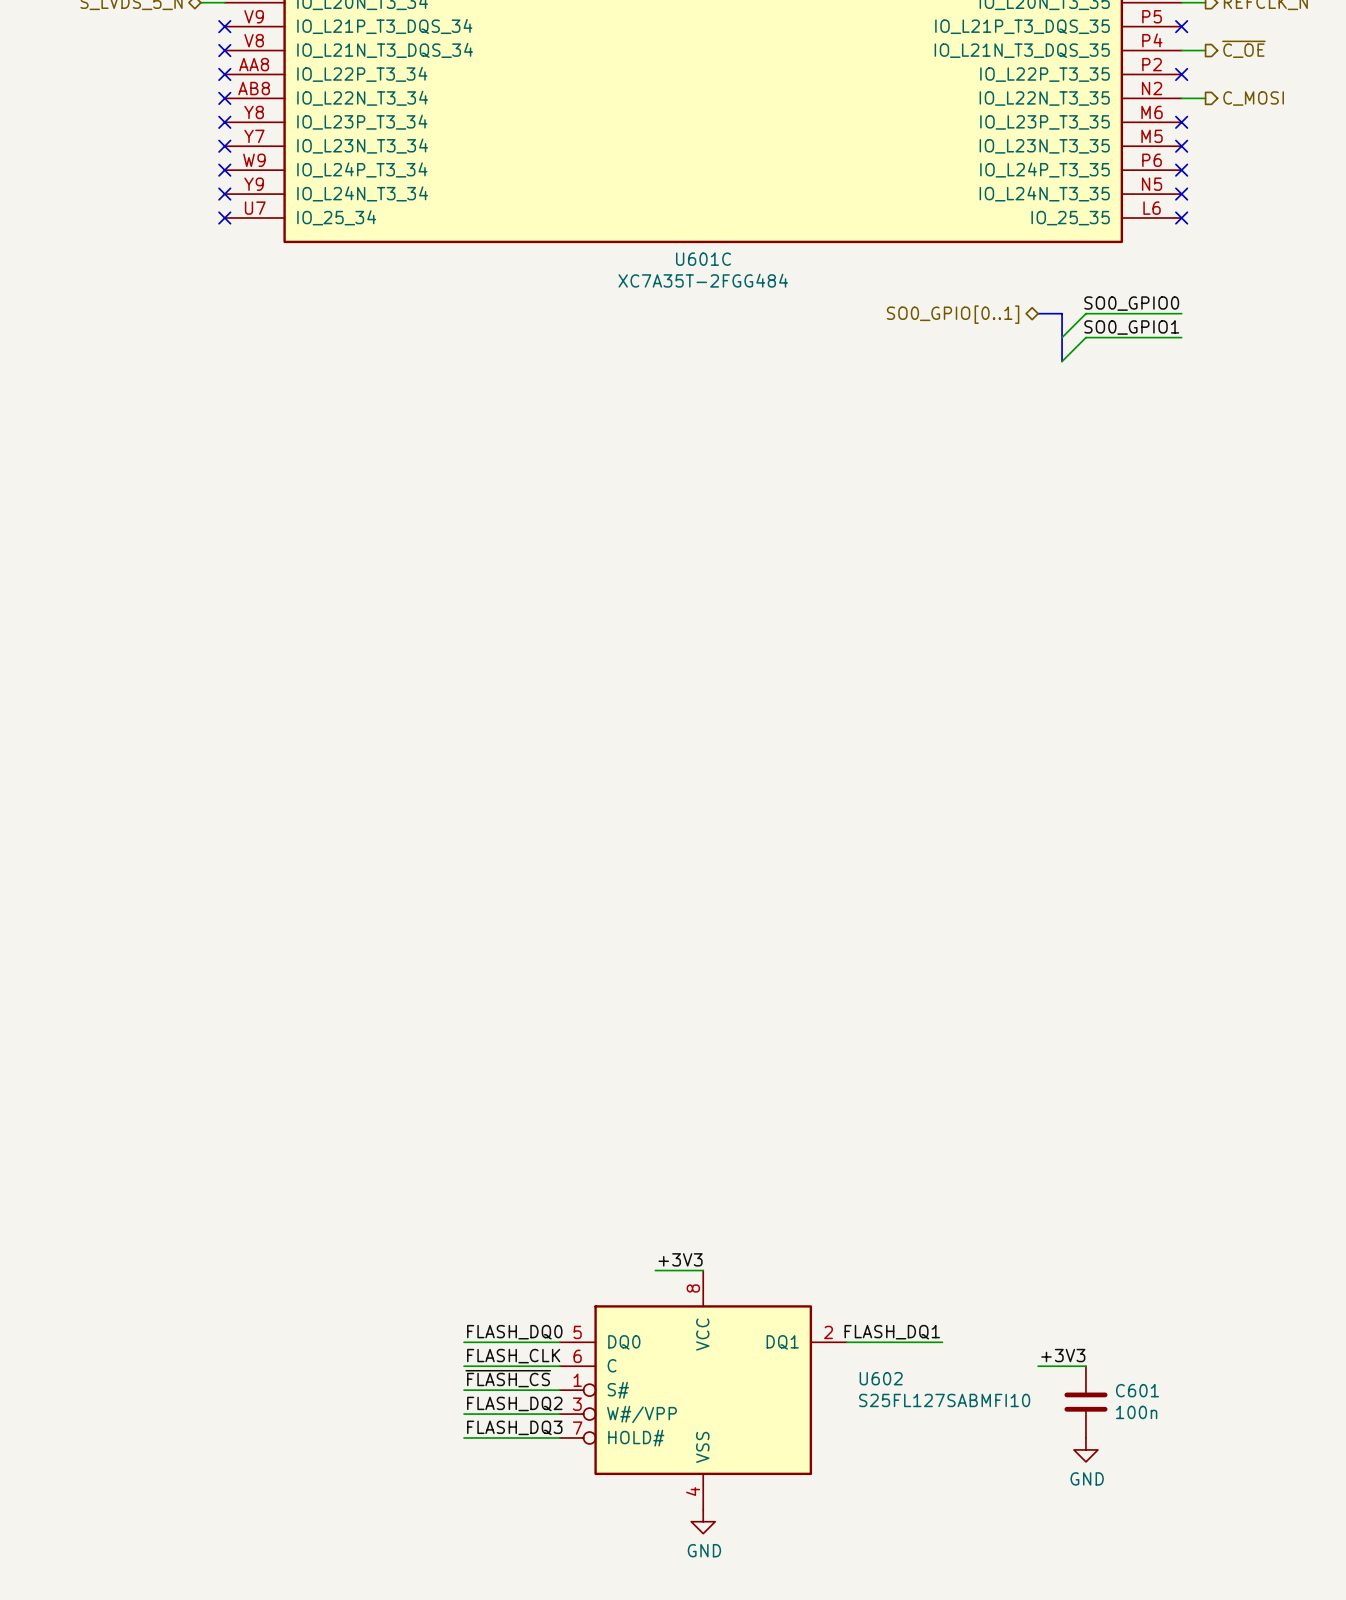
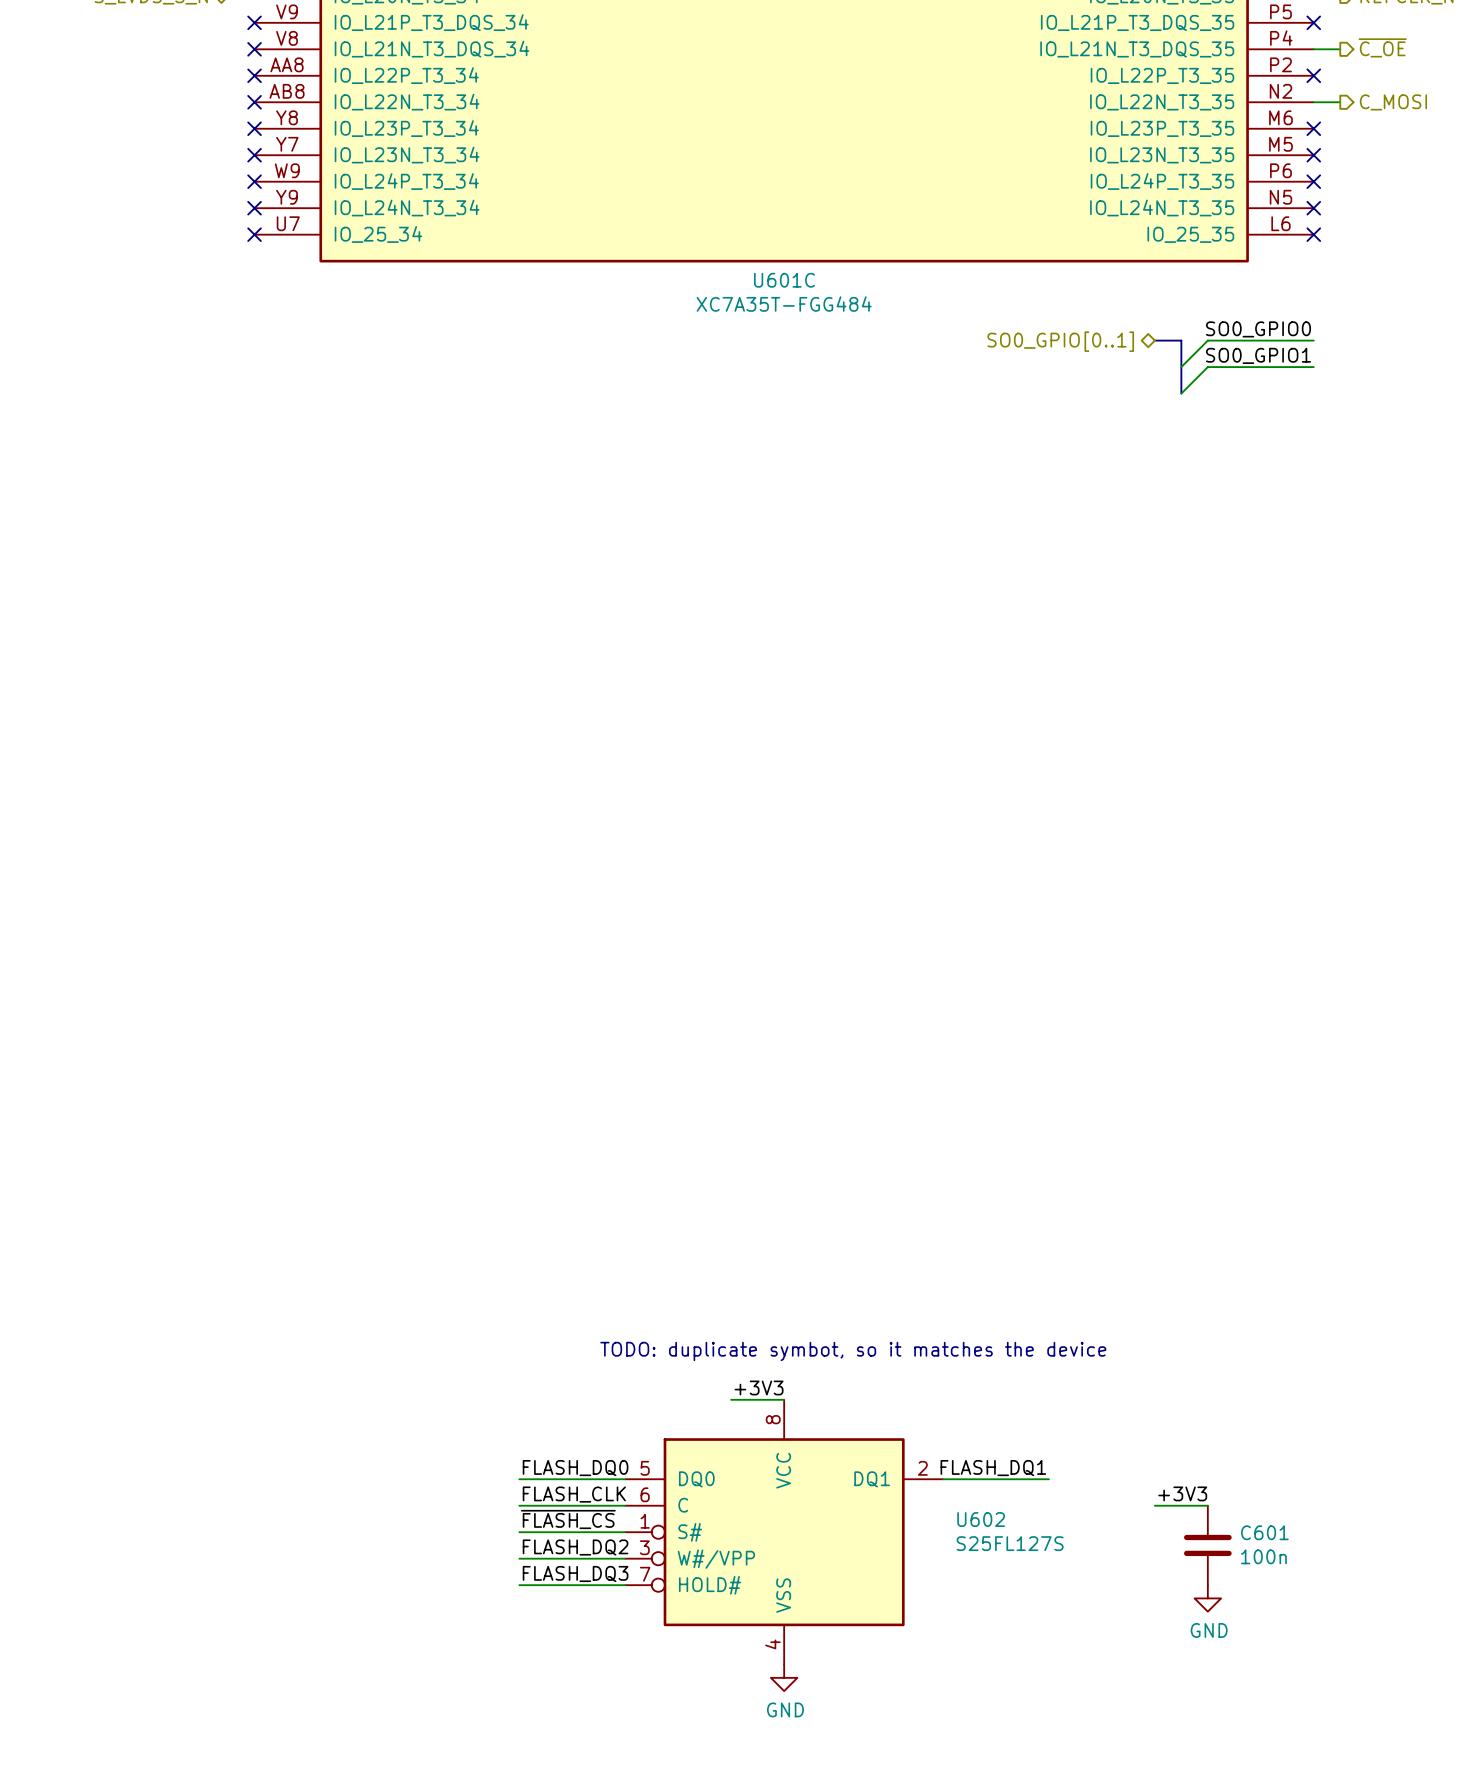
U601C value: XC7A35T-2FGG484 (703, 280) -> XC7A35T-FGG484 (784, 304)
text: none -> TODO: duplicate symbot, so it matches the device (853, 1351)
U602 value: S25FL127SABMFI10 (944, 1400) -> S25FL127S (1010, 1543)

